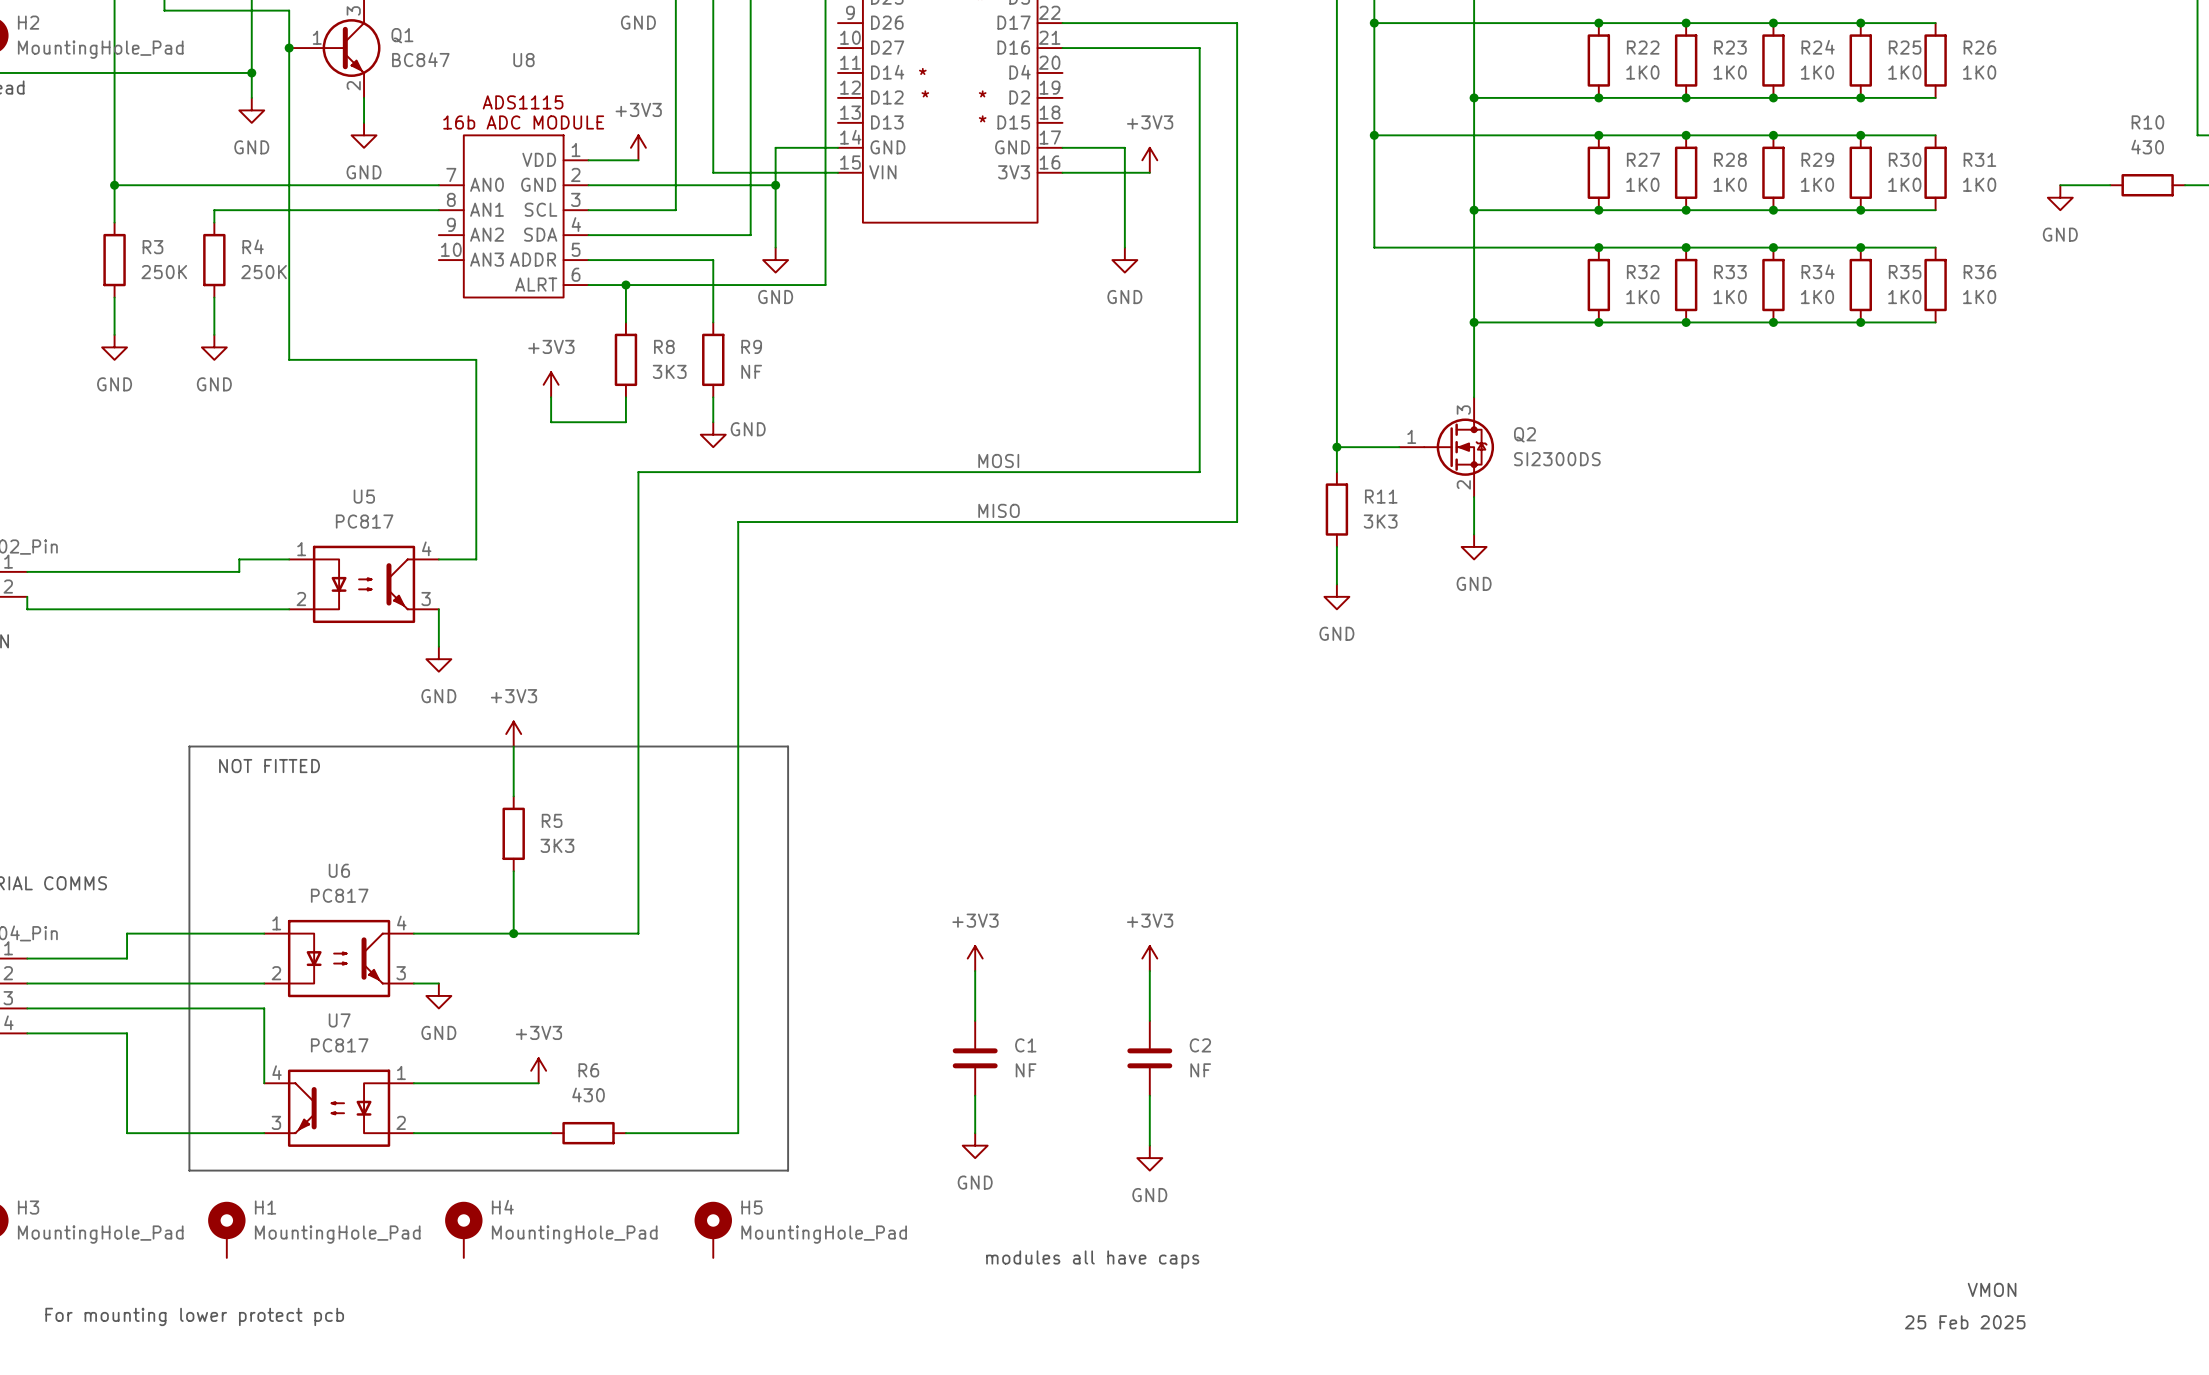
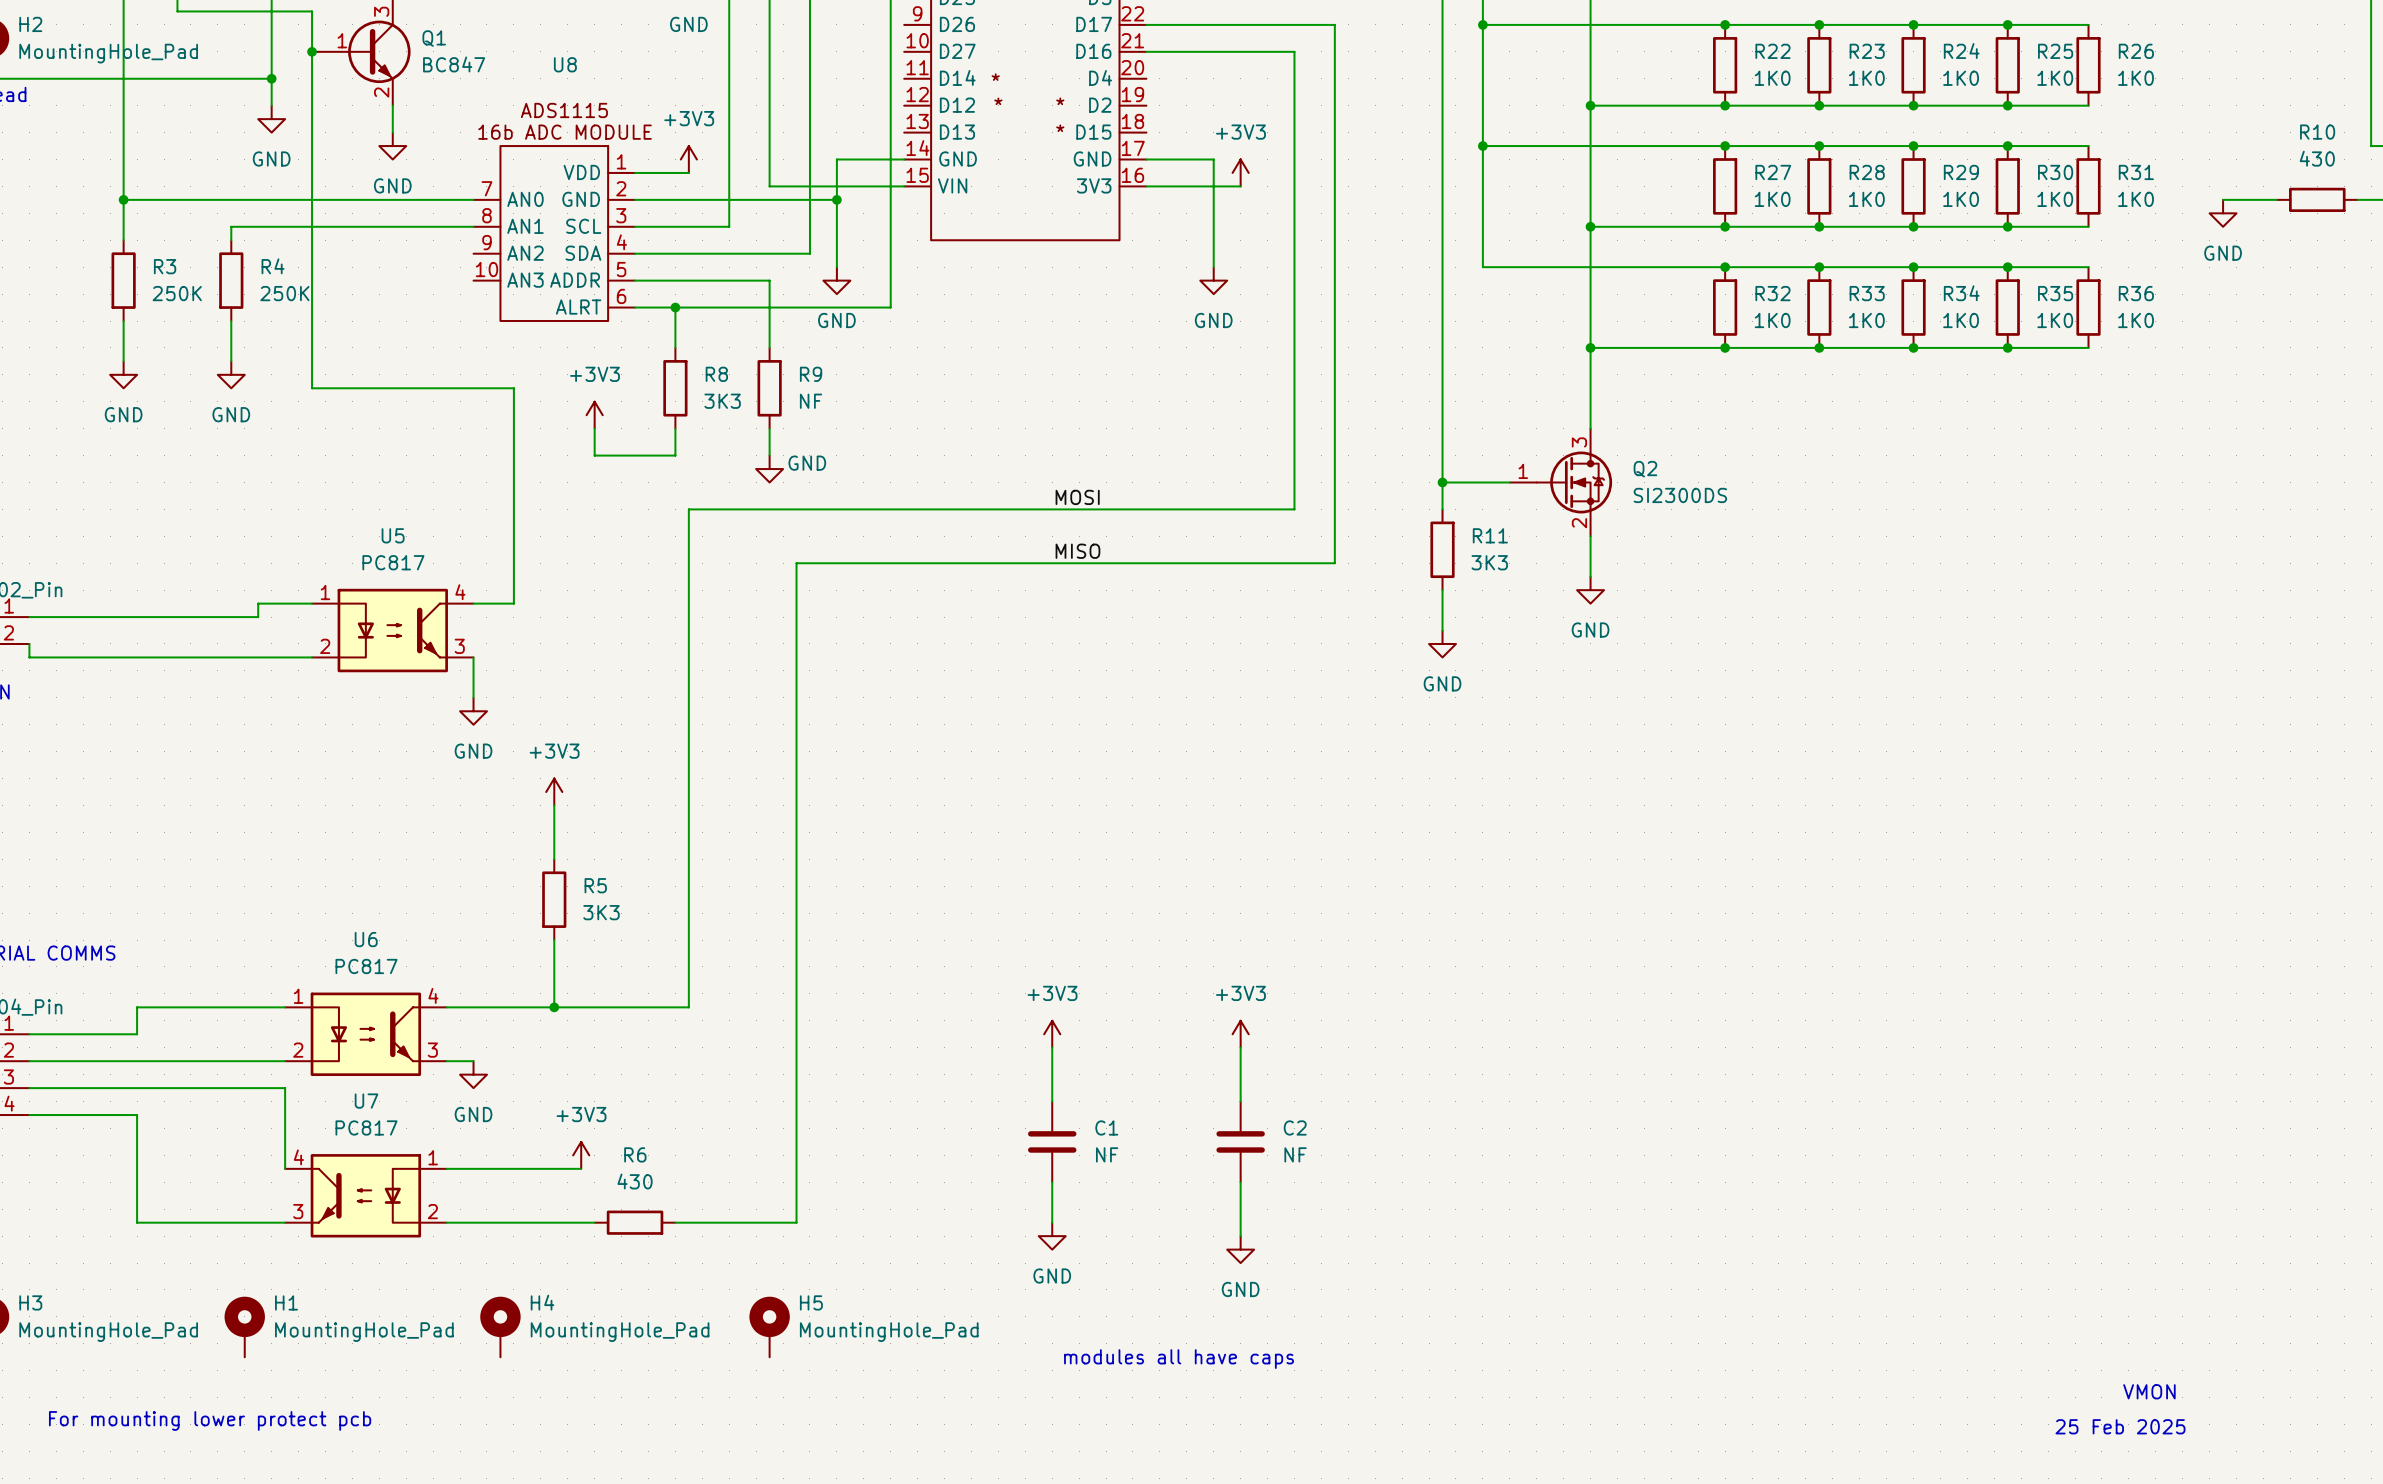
line: (189, 746) (788, 746) (788, 1170) (189, 1170) (189, 746) -> none
text: NOT FITTED (269, 766) -> none

